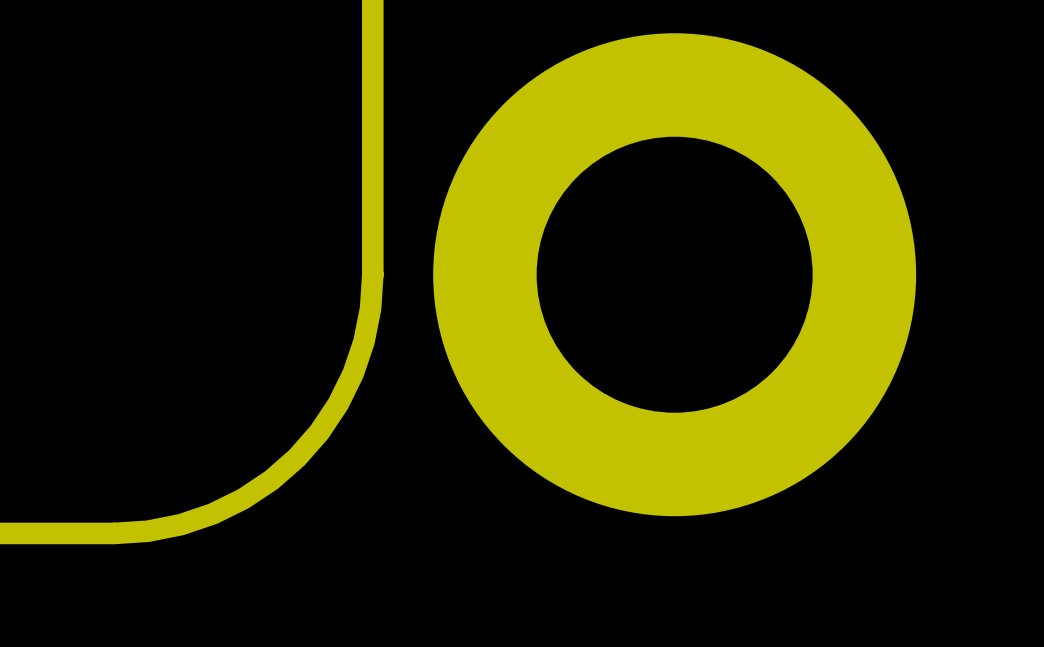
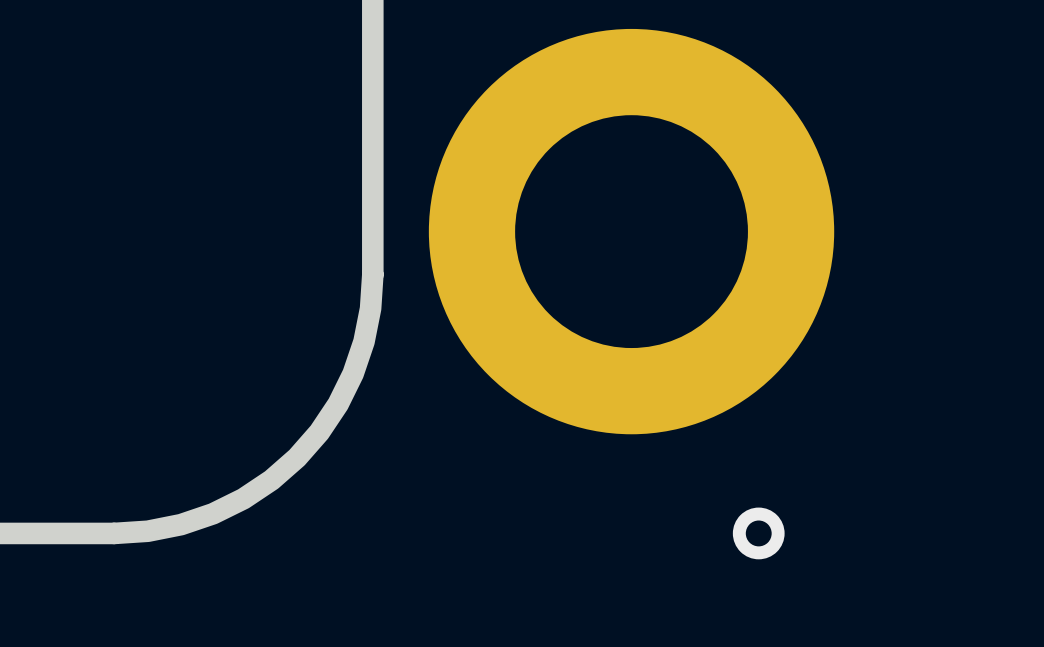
part footprint: [433, 33, 917, 517] -> [428, 28, 835, 435]
via: none -> (758, 533)

